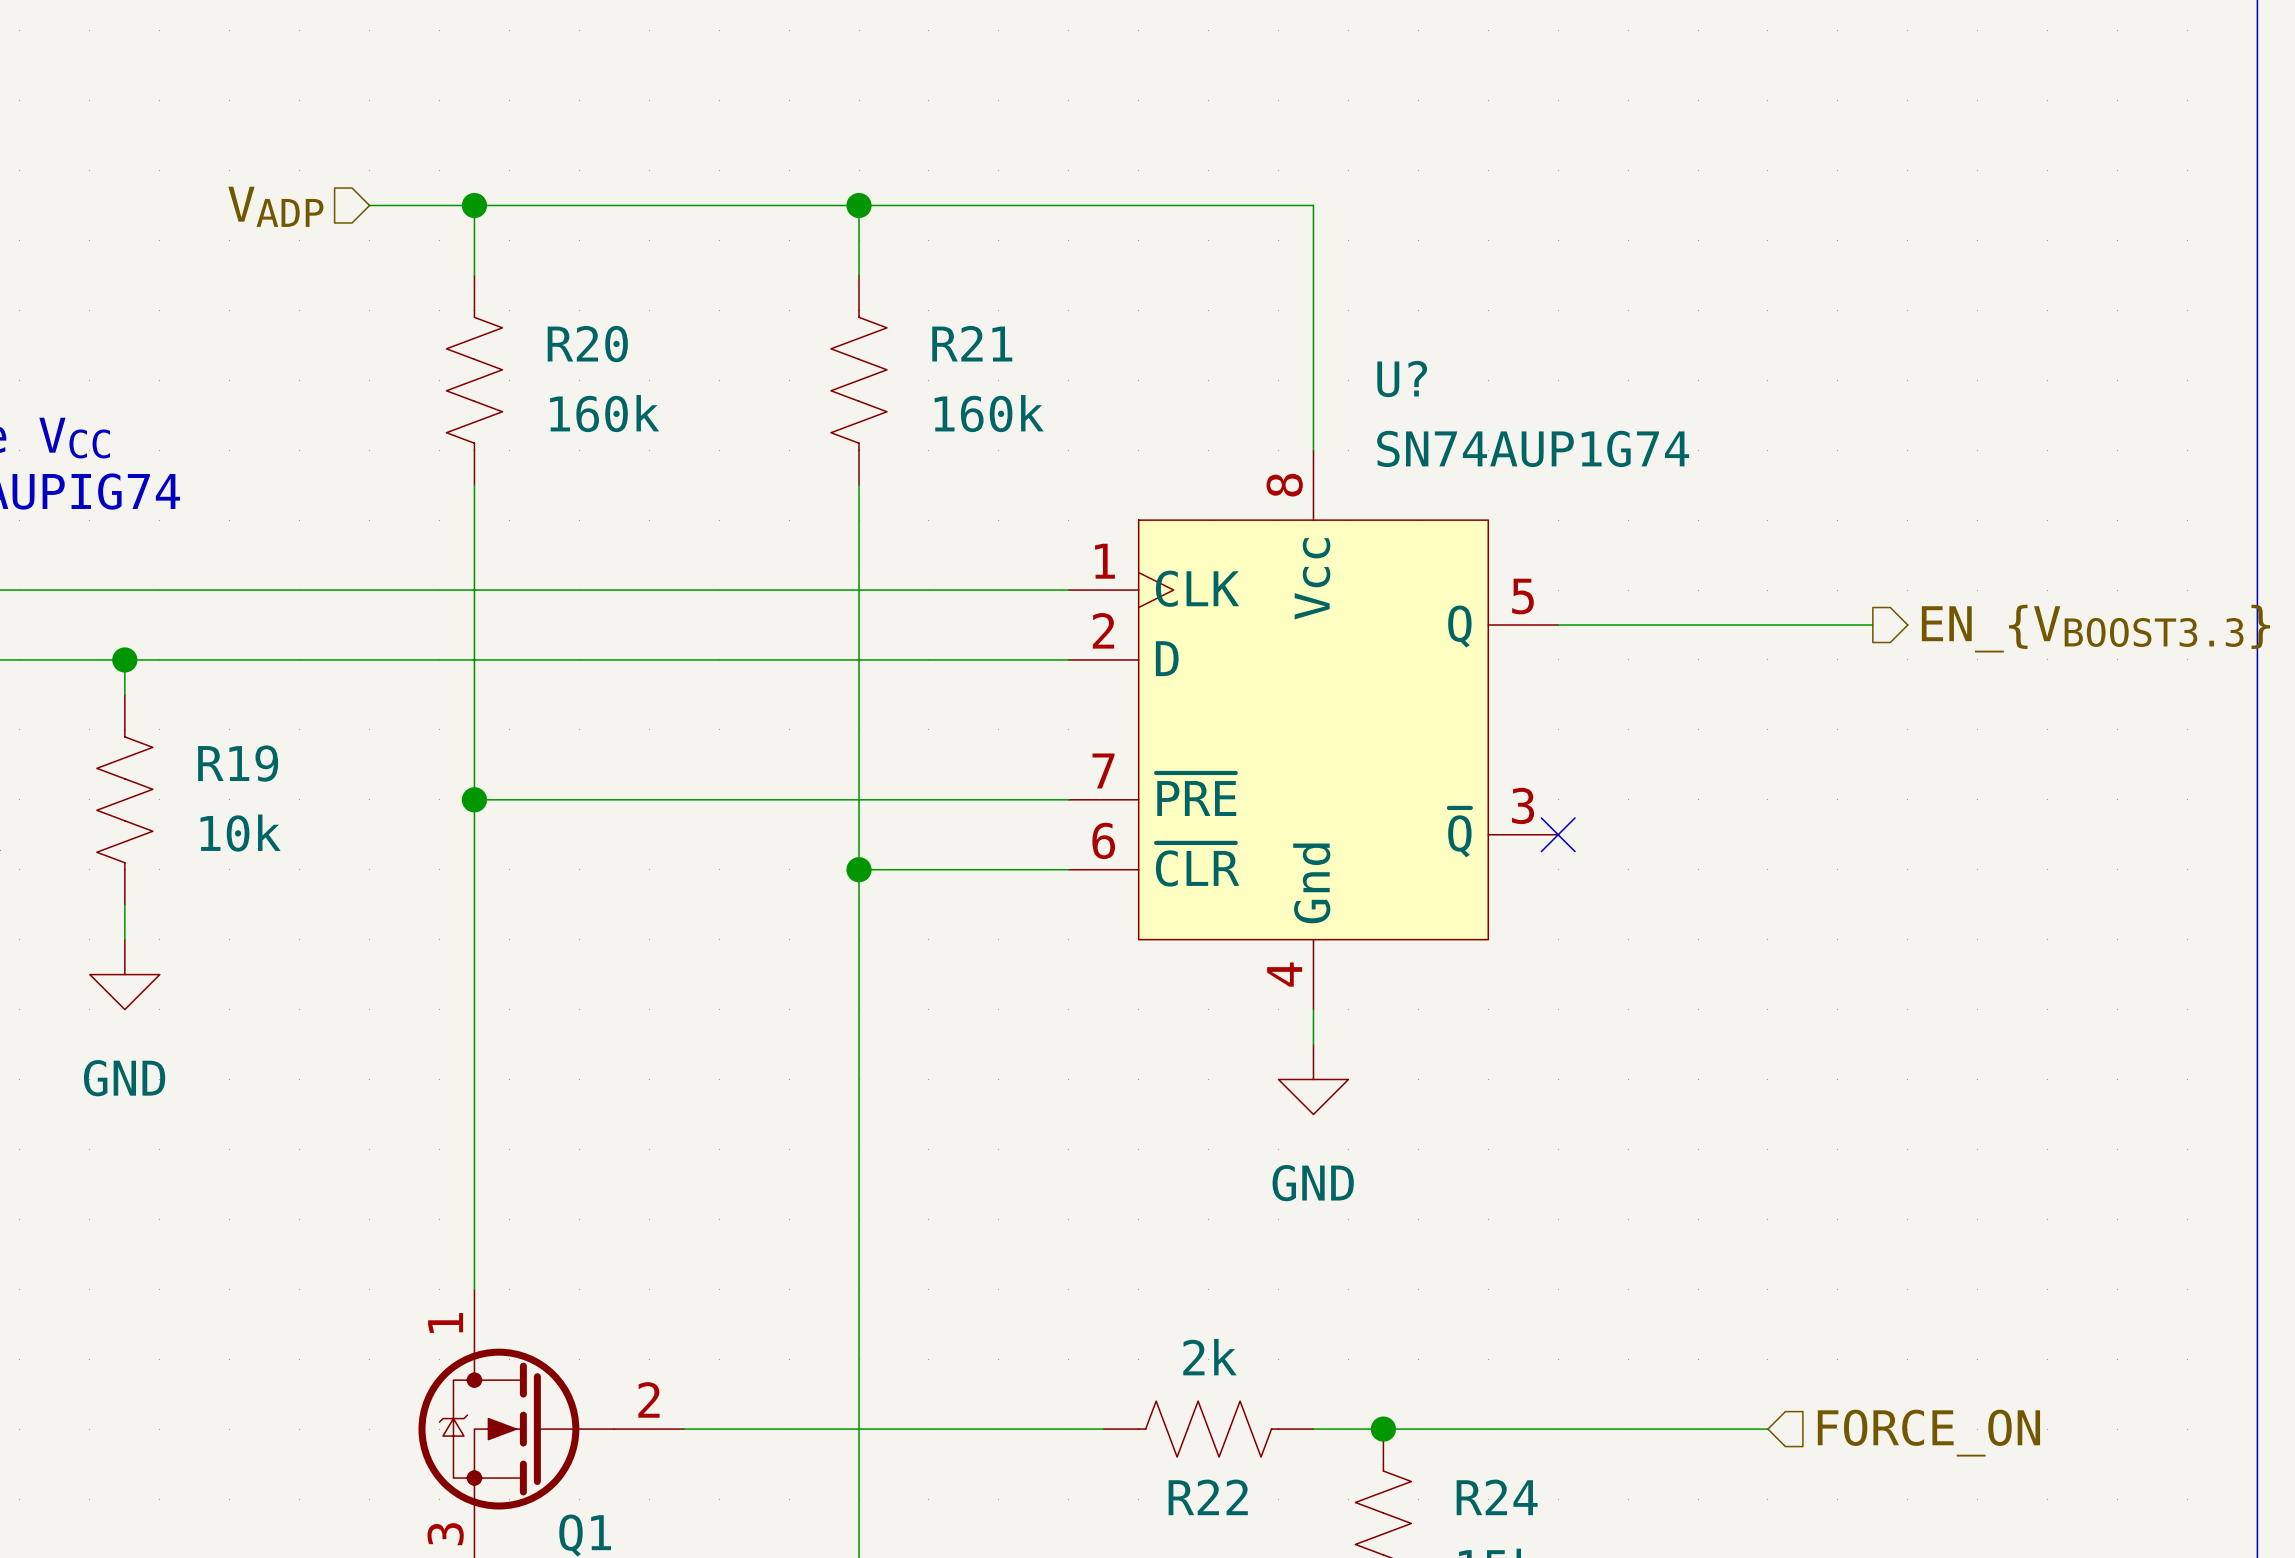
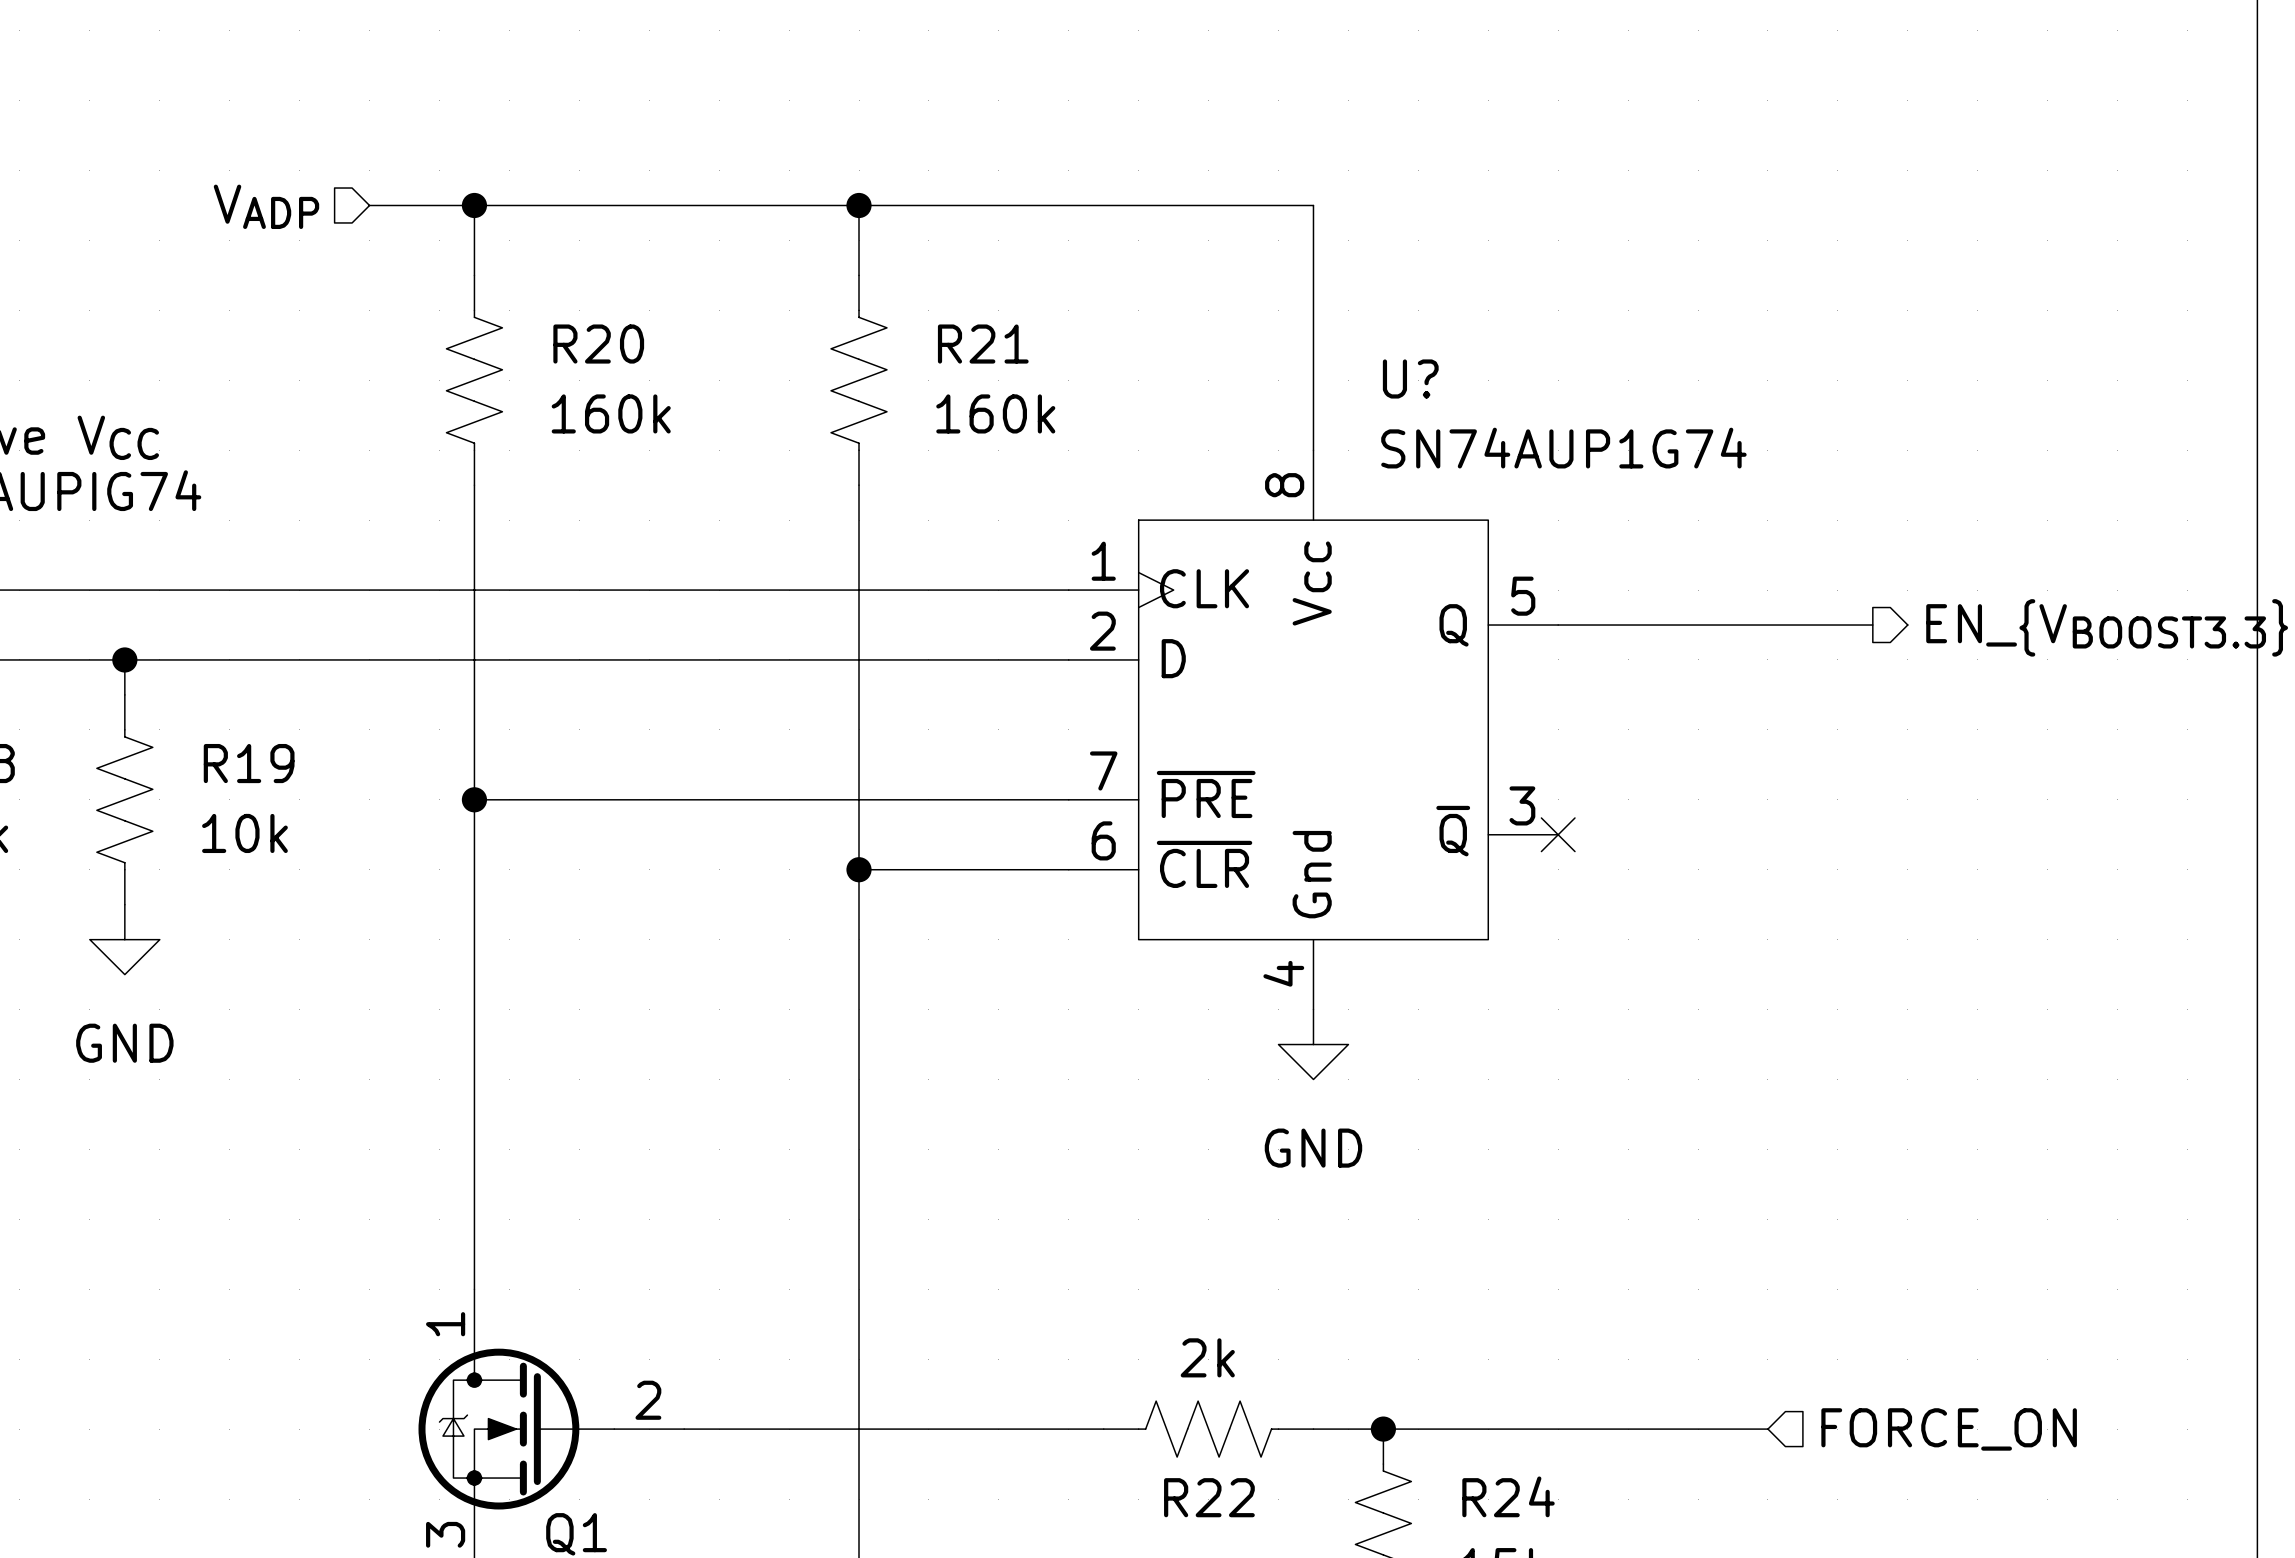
power symbol position: GND (124, 974) -> GND (124, 939)
power symbol position: GND (1313, 1079) -> GND (1313, 1044)

